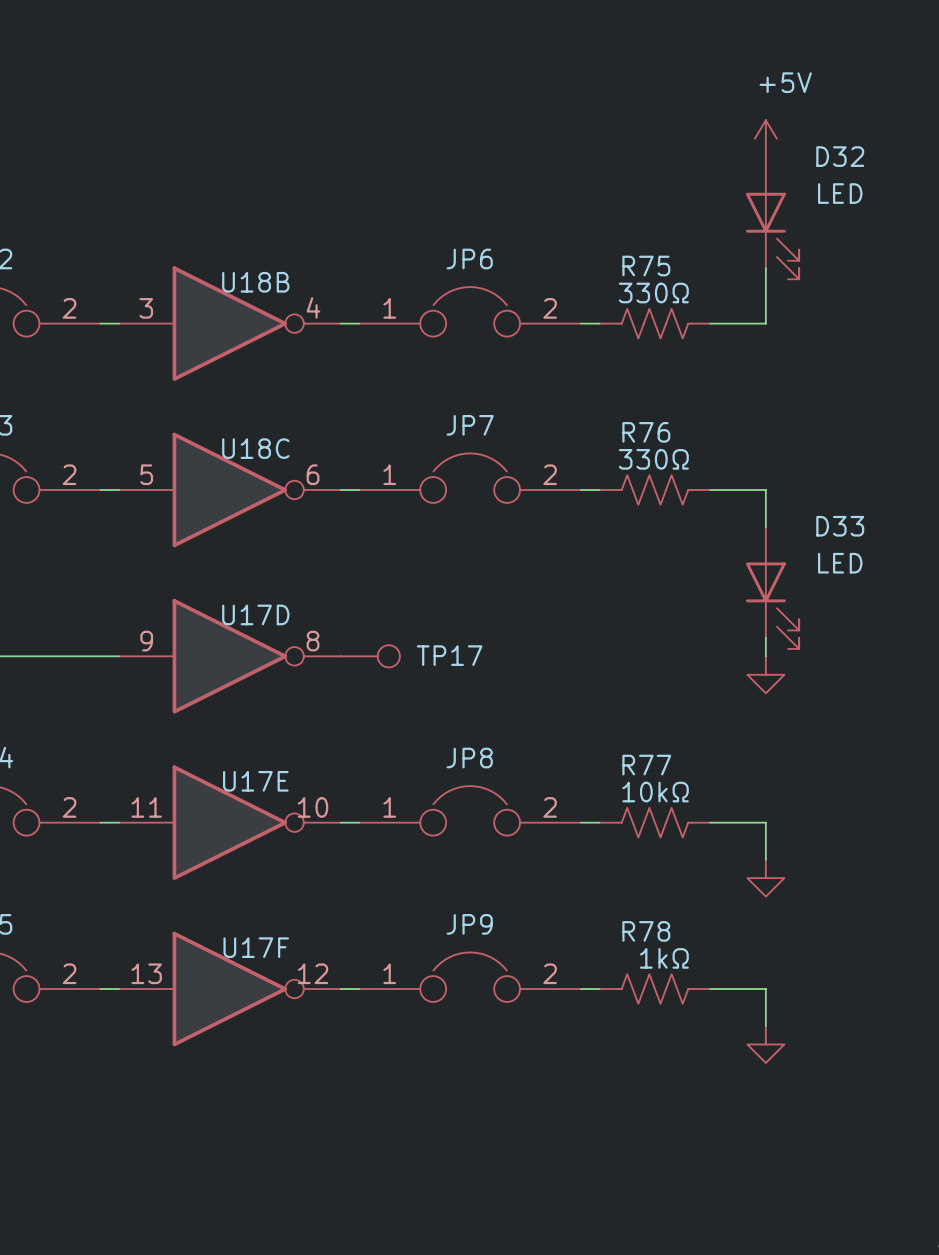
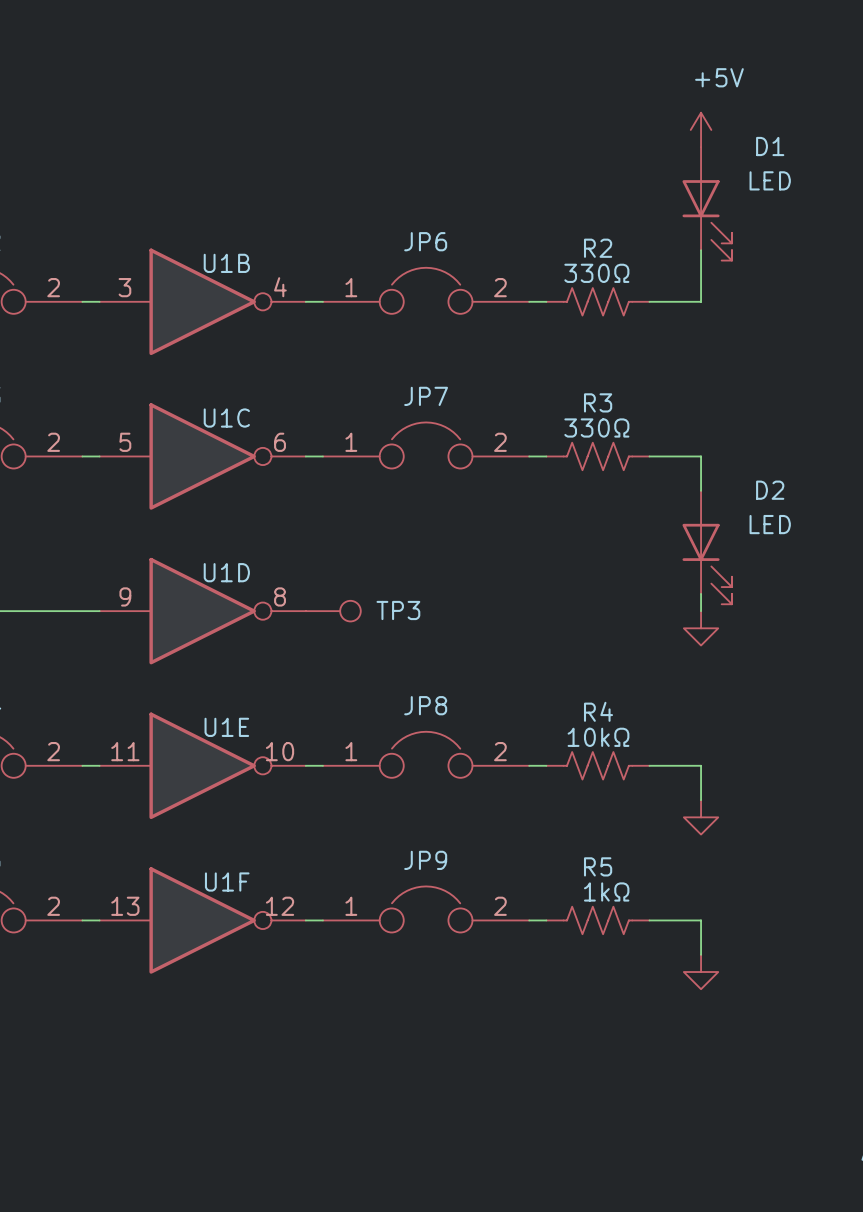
D32 name: D32 (840, 156) -> D1 (770, 146)
R75 name: R75 (646, 266) -> R2 (598, 248)
U18B name: U18B (255, 282) -> U1B (226, 263)
R76 name: R76 (646, 432) -> R3 (598, 402)
U18C name: U18C (255, 448) -> U1C (226, 418)
D33 name: D33 (840, 526) -> D2 (770, 490)
U17D name: U17D (255, 614) -> U1D (226, 572)
TP17 name: TP17 (449, 655) -> TP3 (398, 610)
R77 name: R77 (646, 765) -> R4 (598, 711)
U17E name: U17E (255, 781) -> U1E (226, 727)
R78 name: R78 (646, 931) -> R5 (598, 866)
U17F name: U17F (256, 947) -> U1F (227, 882)

